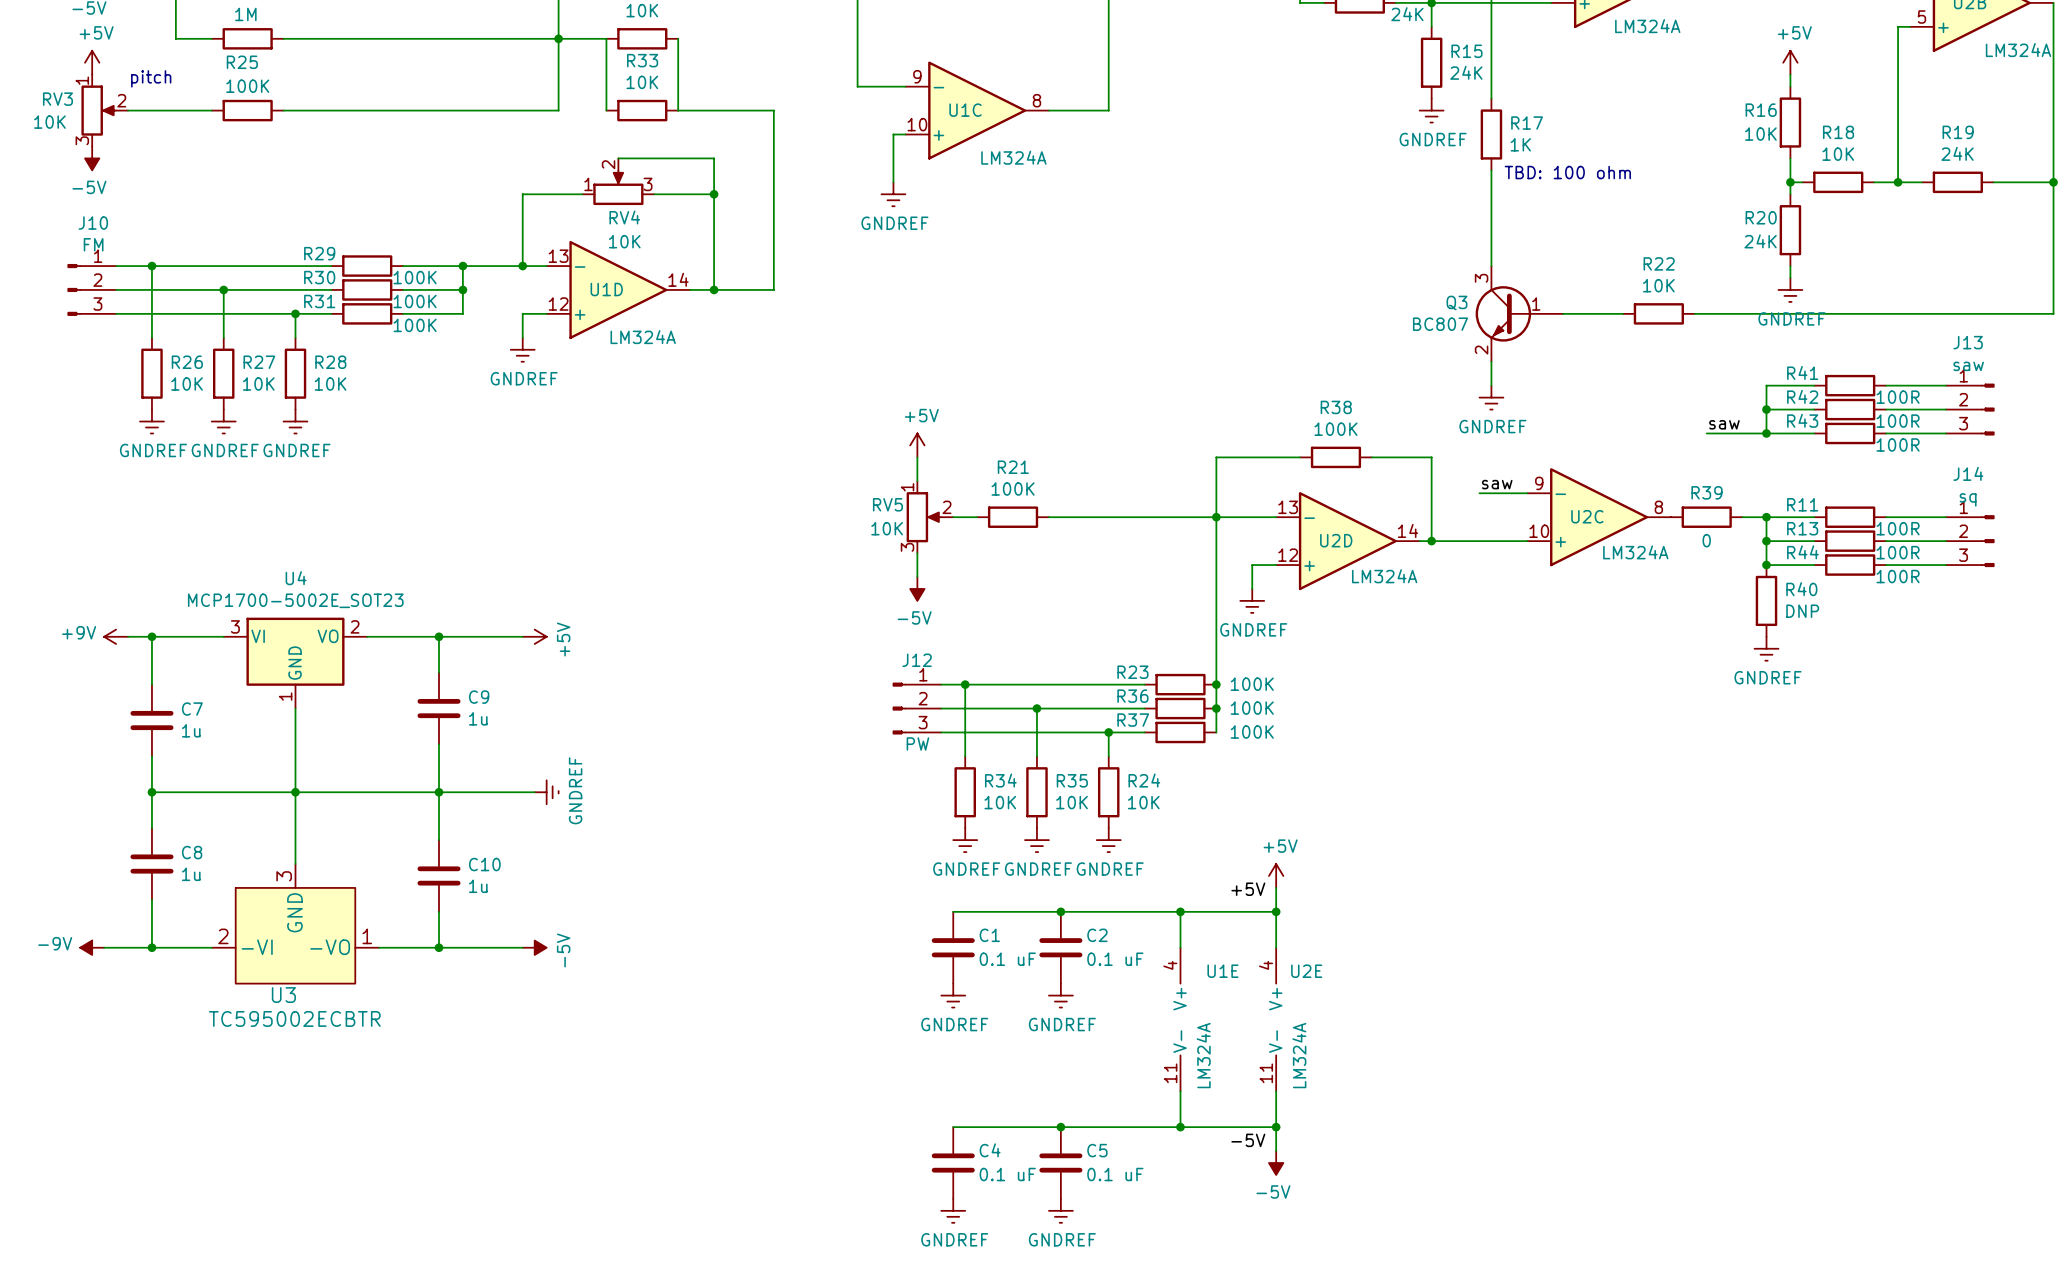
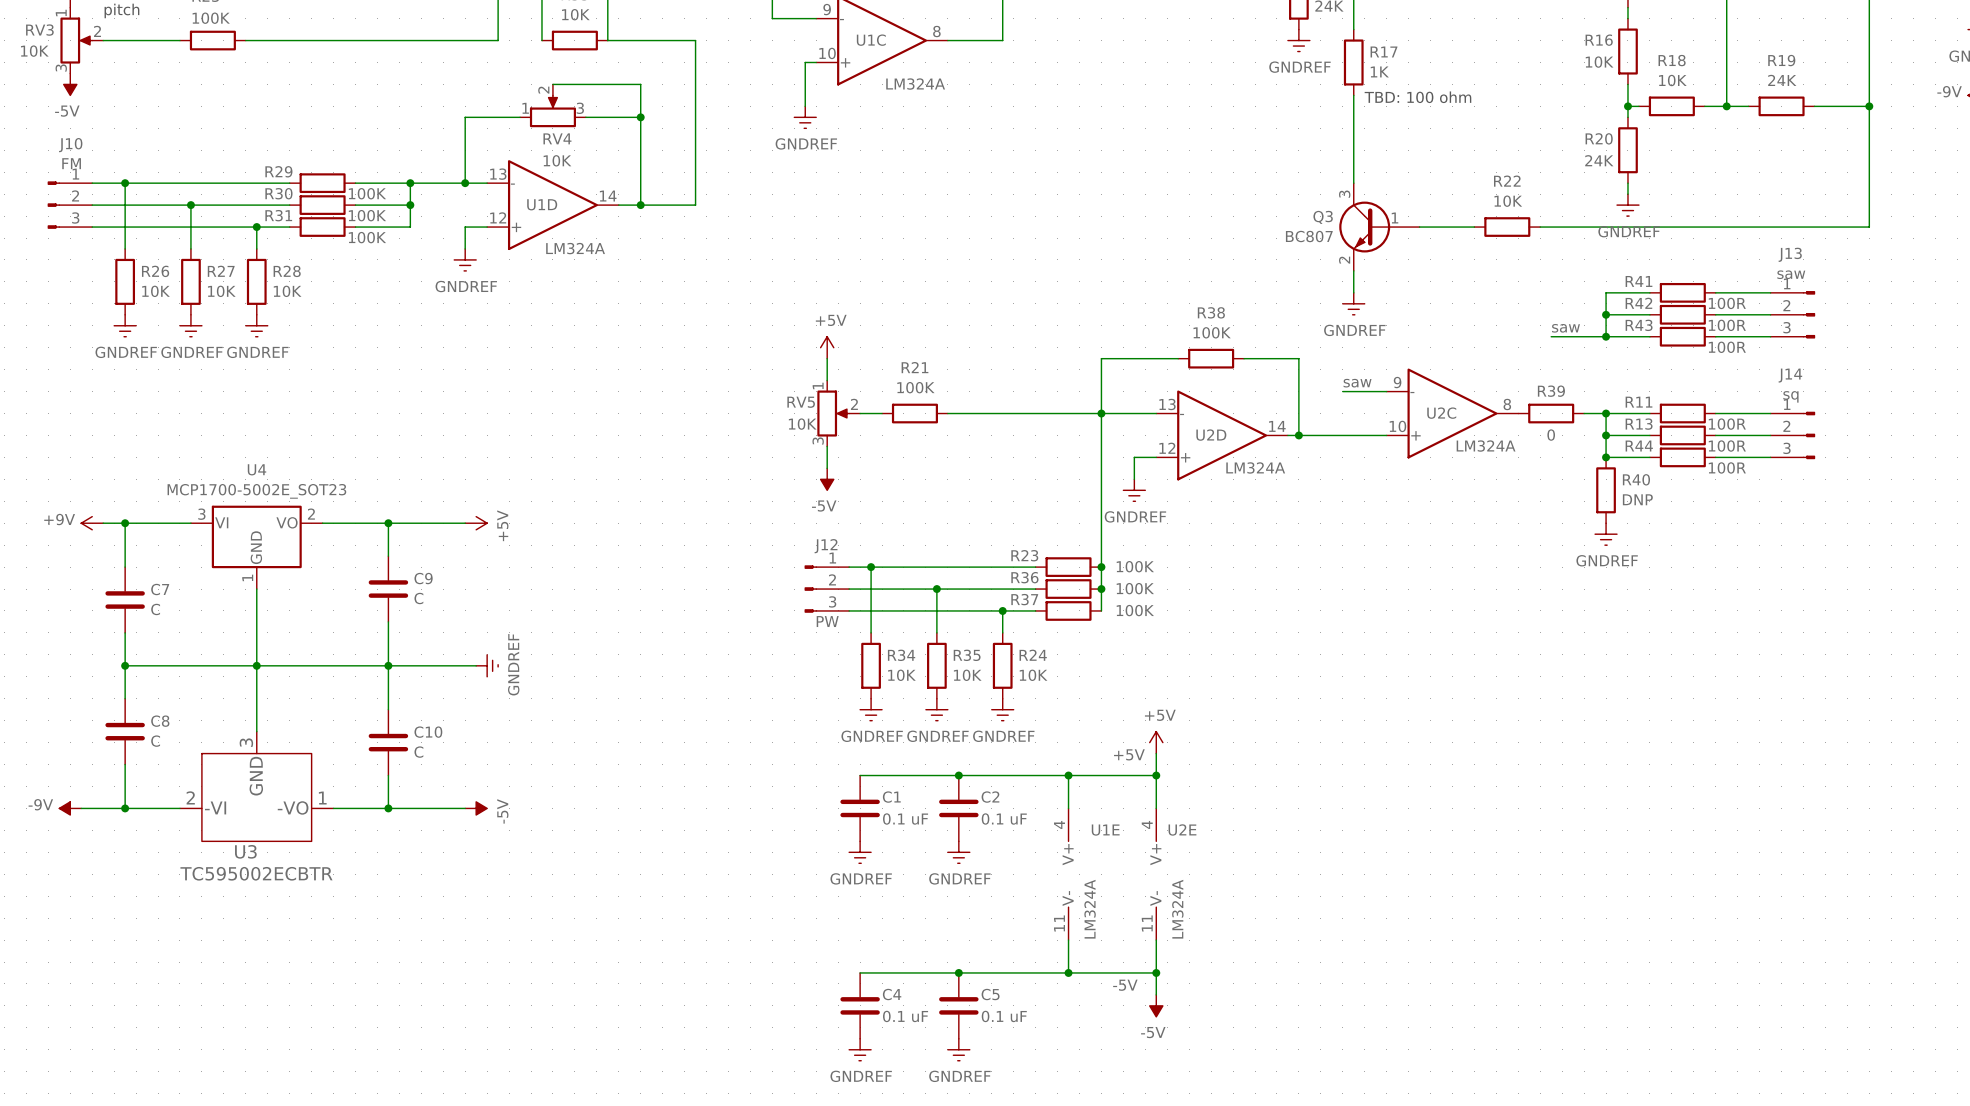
C9 value: 1u (478, 718) -> C (418, 598)
C7 value: 1u (191, 730) -> C (155, 609)
C8 value: 1u (191, 874) -> C (155, 741)
C10 value: 1u (478, 886) -> C (418, 752)

